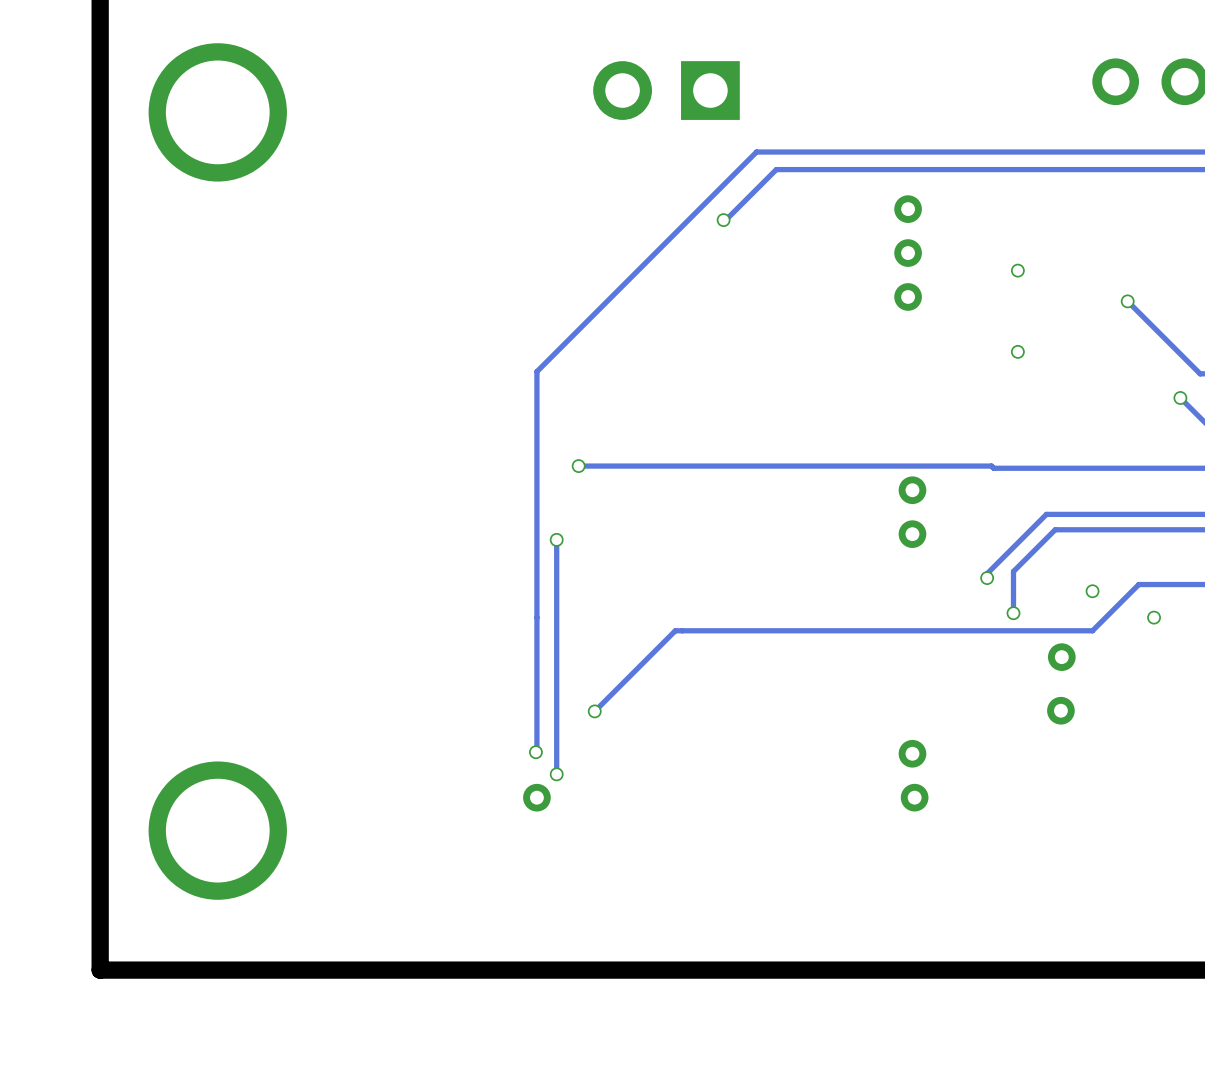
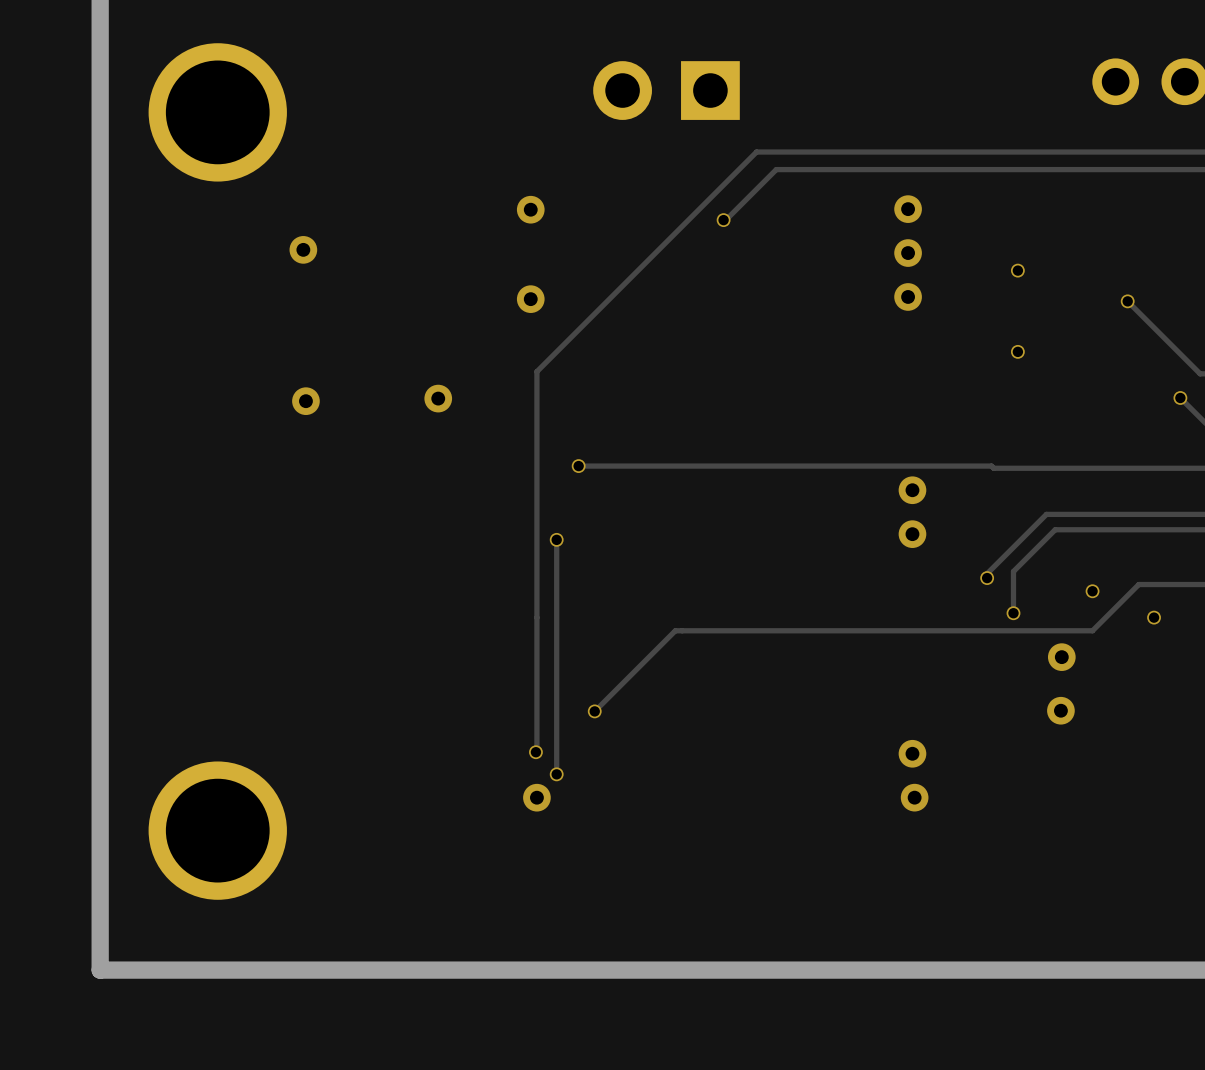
via: none -> (530, 209)
via: none -> (303, 249)
via: none -> (530, 299)
via: none -> (438, 398)
via: none -> (305, 401)

